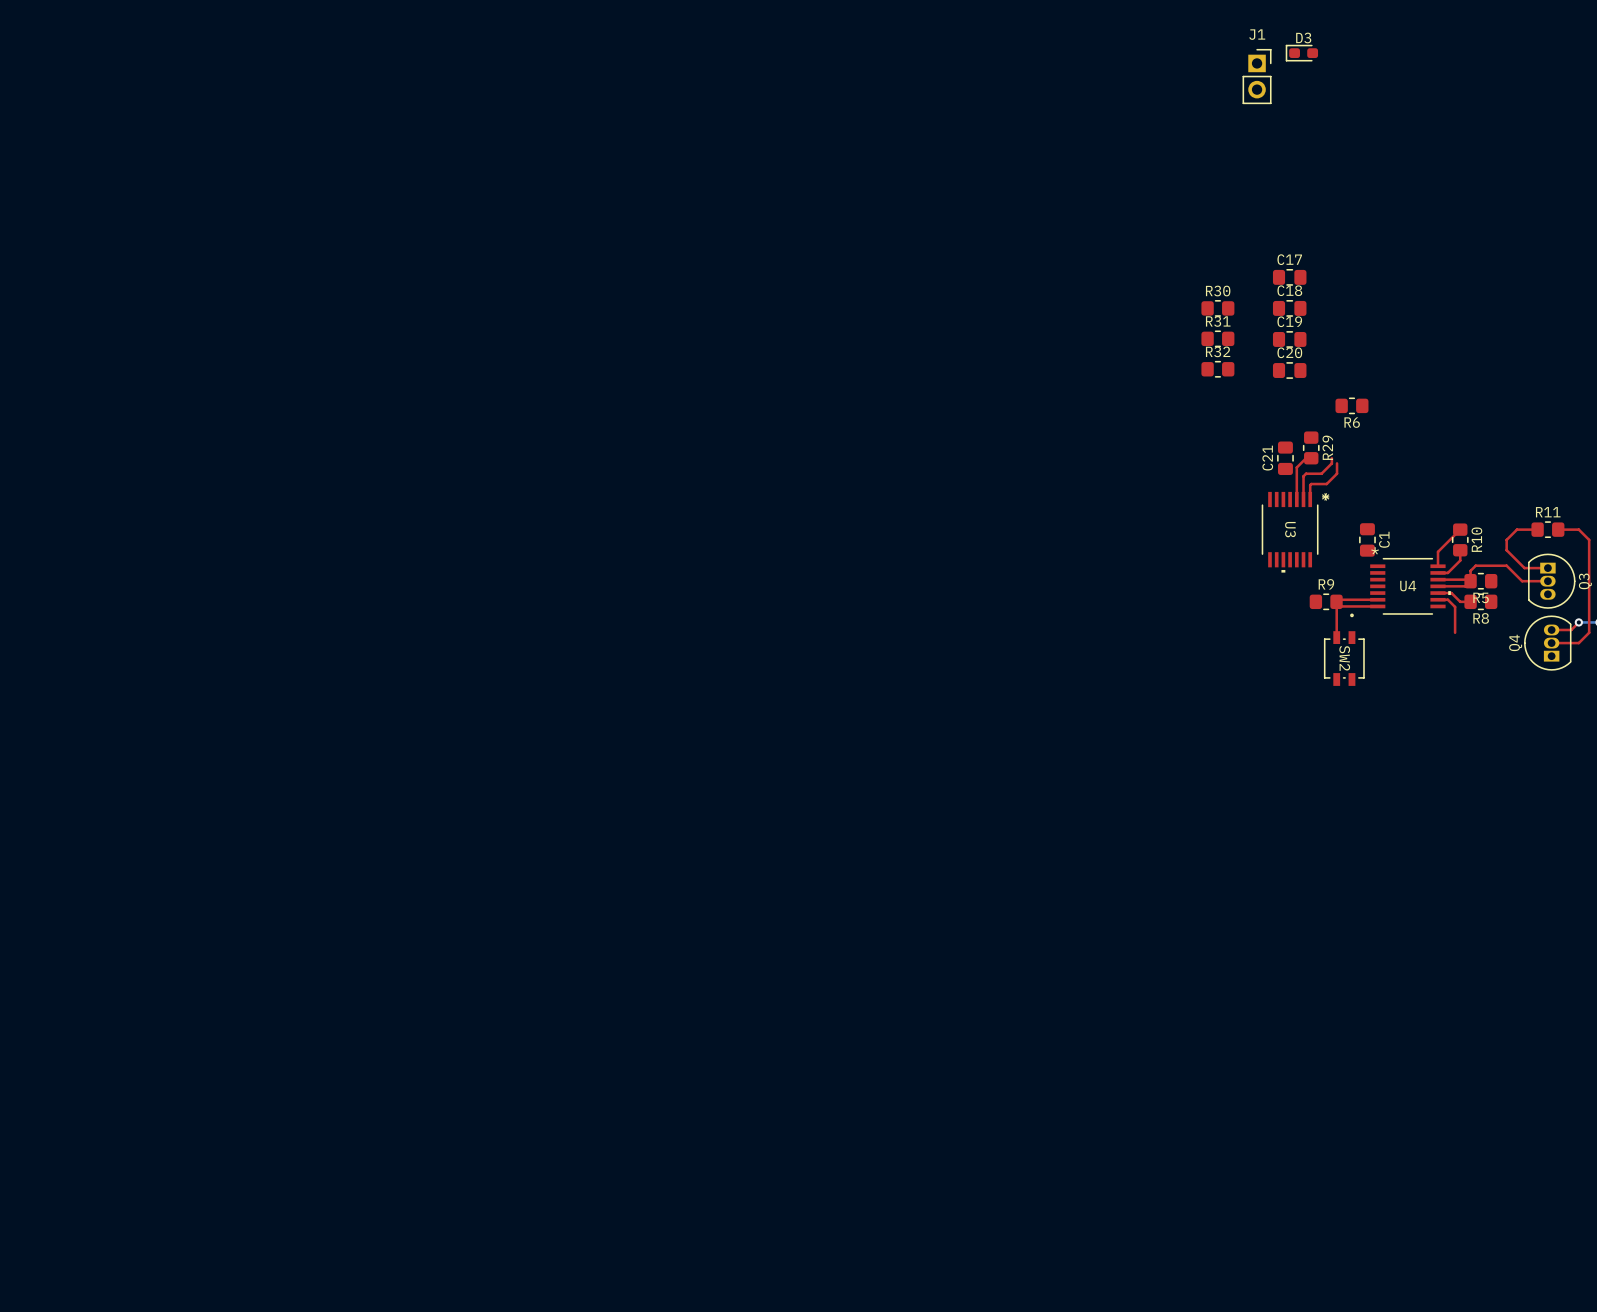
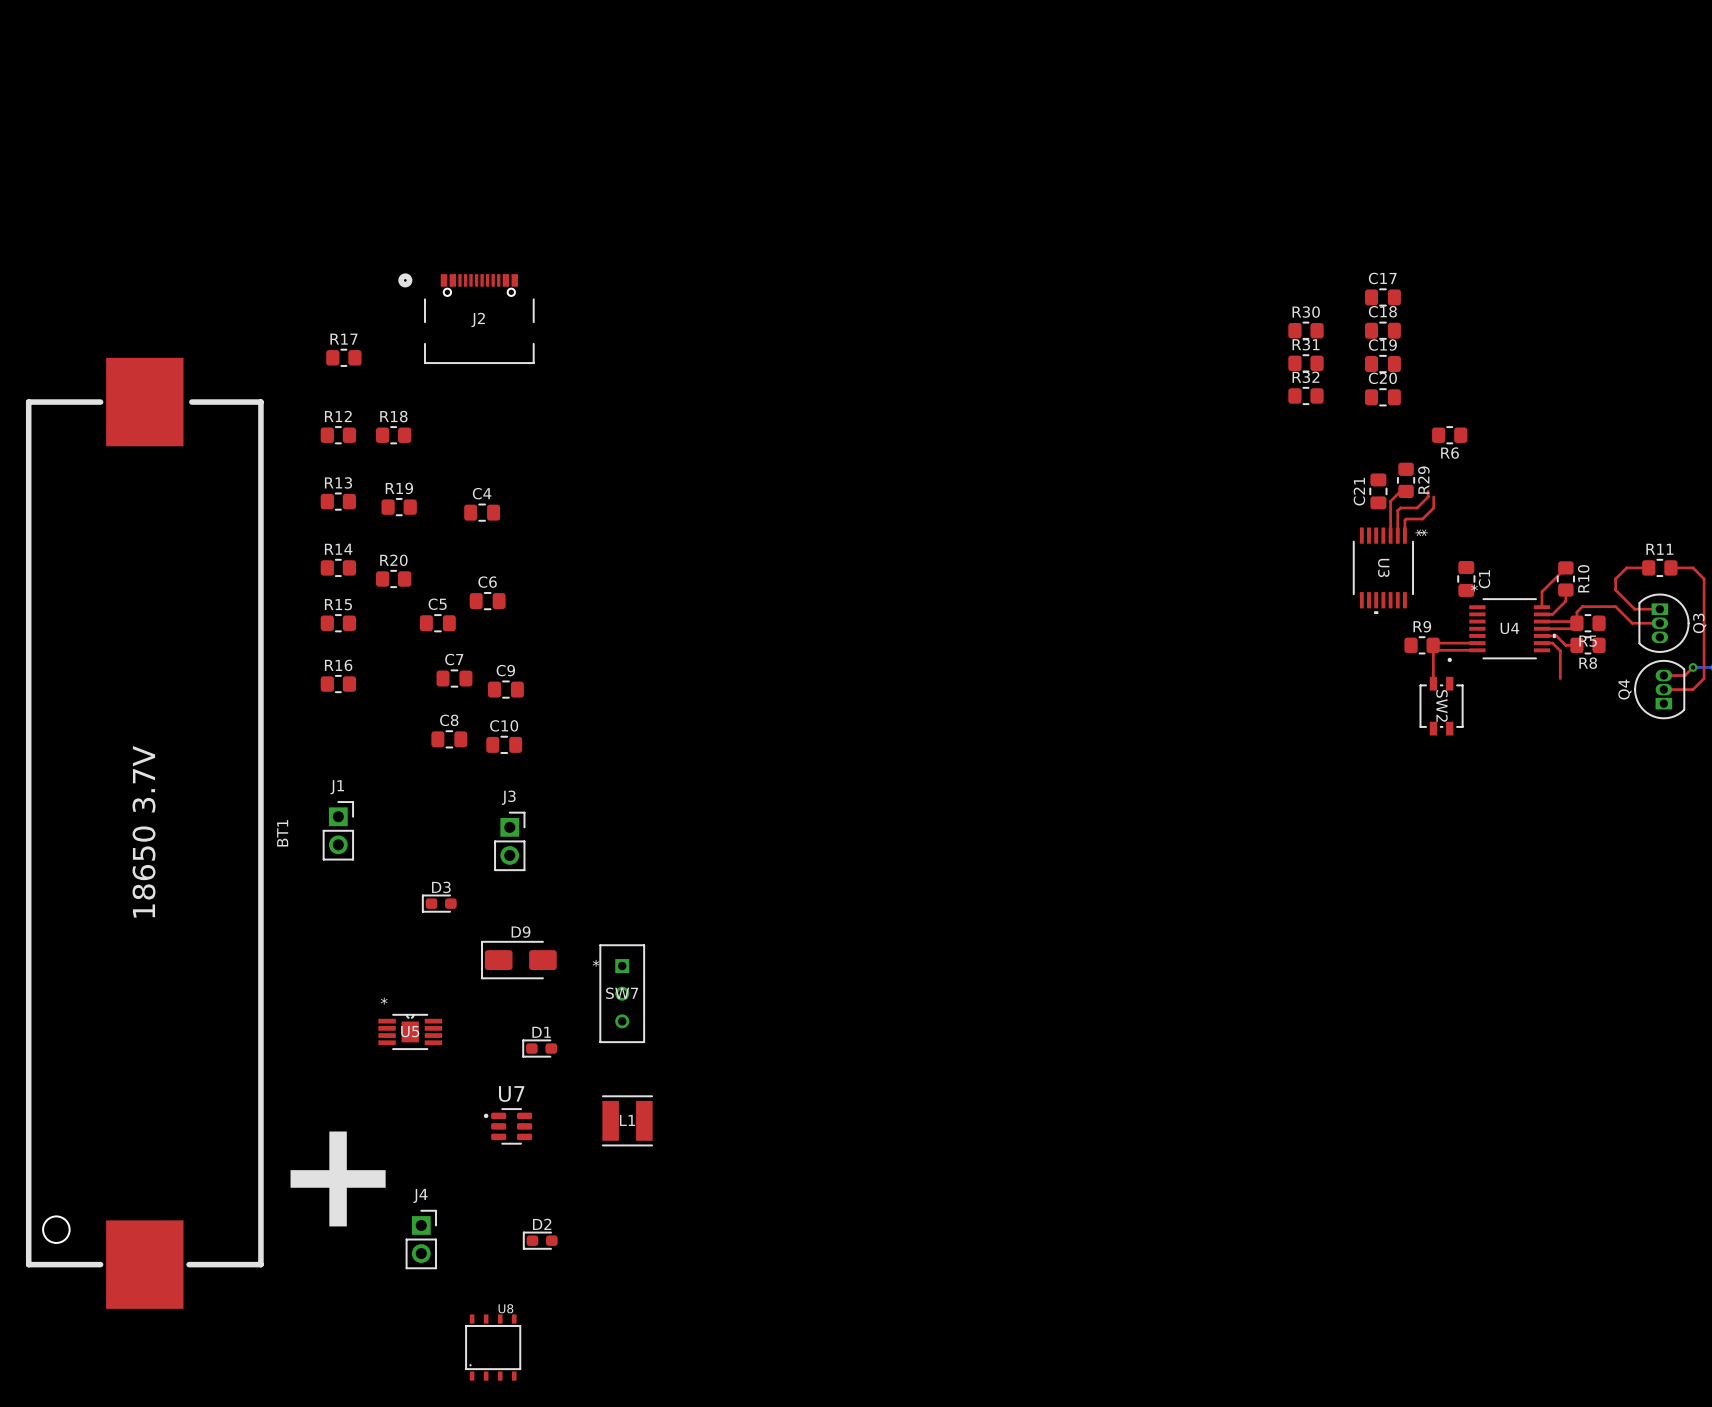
D3 position: (1301, 53) -> (439, 903)
J1 position: (1257, 76) -> (338, 830)
J2: none -> (466, 318)
R17: none -> (343, 357)
R12: none -> (338, 435)
R18: none -> (393, 435)
R13: none -> (338, 501)
R19: none -> (399, 507)
C4: none -> (482, 512)
R14: none -> (338, 567)
R20: none -> (393, 578)
C6: none -> (487, 601)
R15: none -> (338, 623)
C5: none -> (437, 623)
C7: none -> (454, 678)
R16: none -> (338, 684)
C9: none -> (505, 689)
C8: none -> (449, 739)
C10: none -> (504, 744)
BT1: none -> (144, 833)
J3: none -> (509, 841)
D9: none -> (519, 960)
SW7: none -> (622, 993)
U5: none -> (410, 1031)
D1: none -> (539, 1048)
L1: none -> (627, 1120)
U7: none -> (508, 1126)
J4: none -> (421, 1239)
D2: none -> (540, 1240)
U8: none -> (493, 1347)

